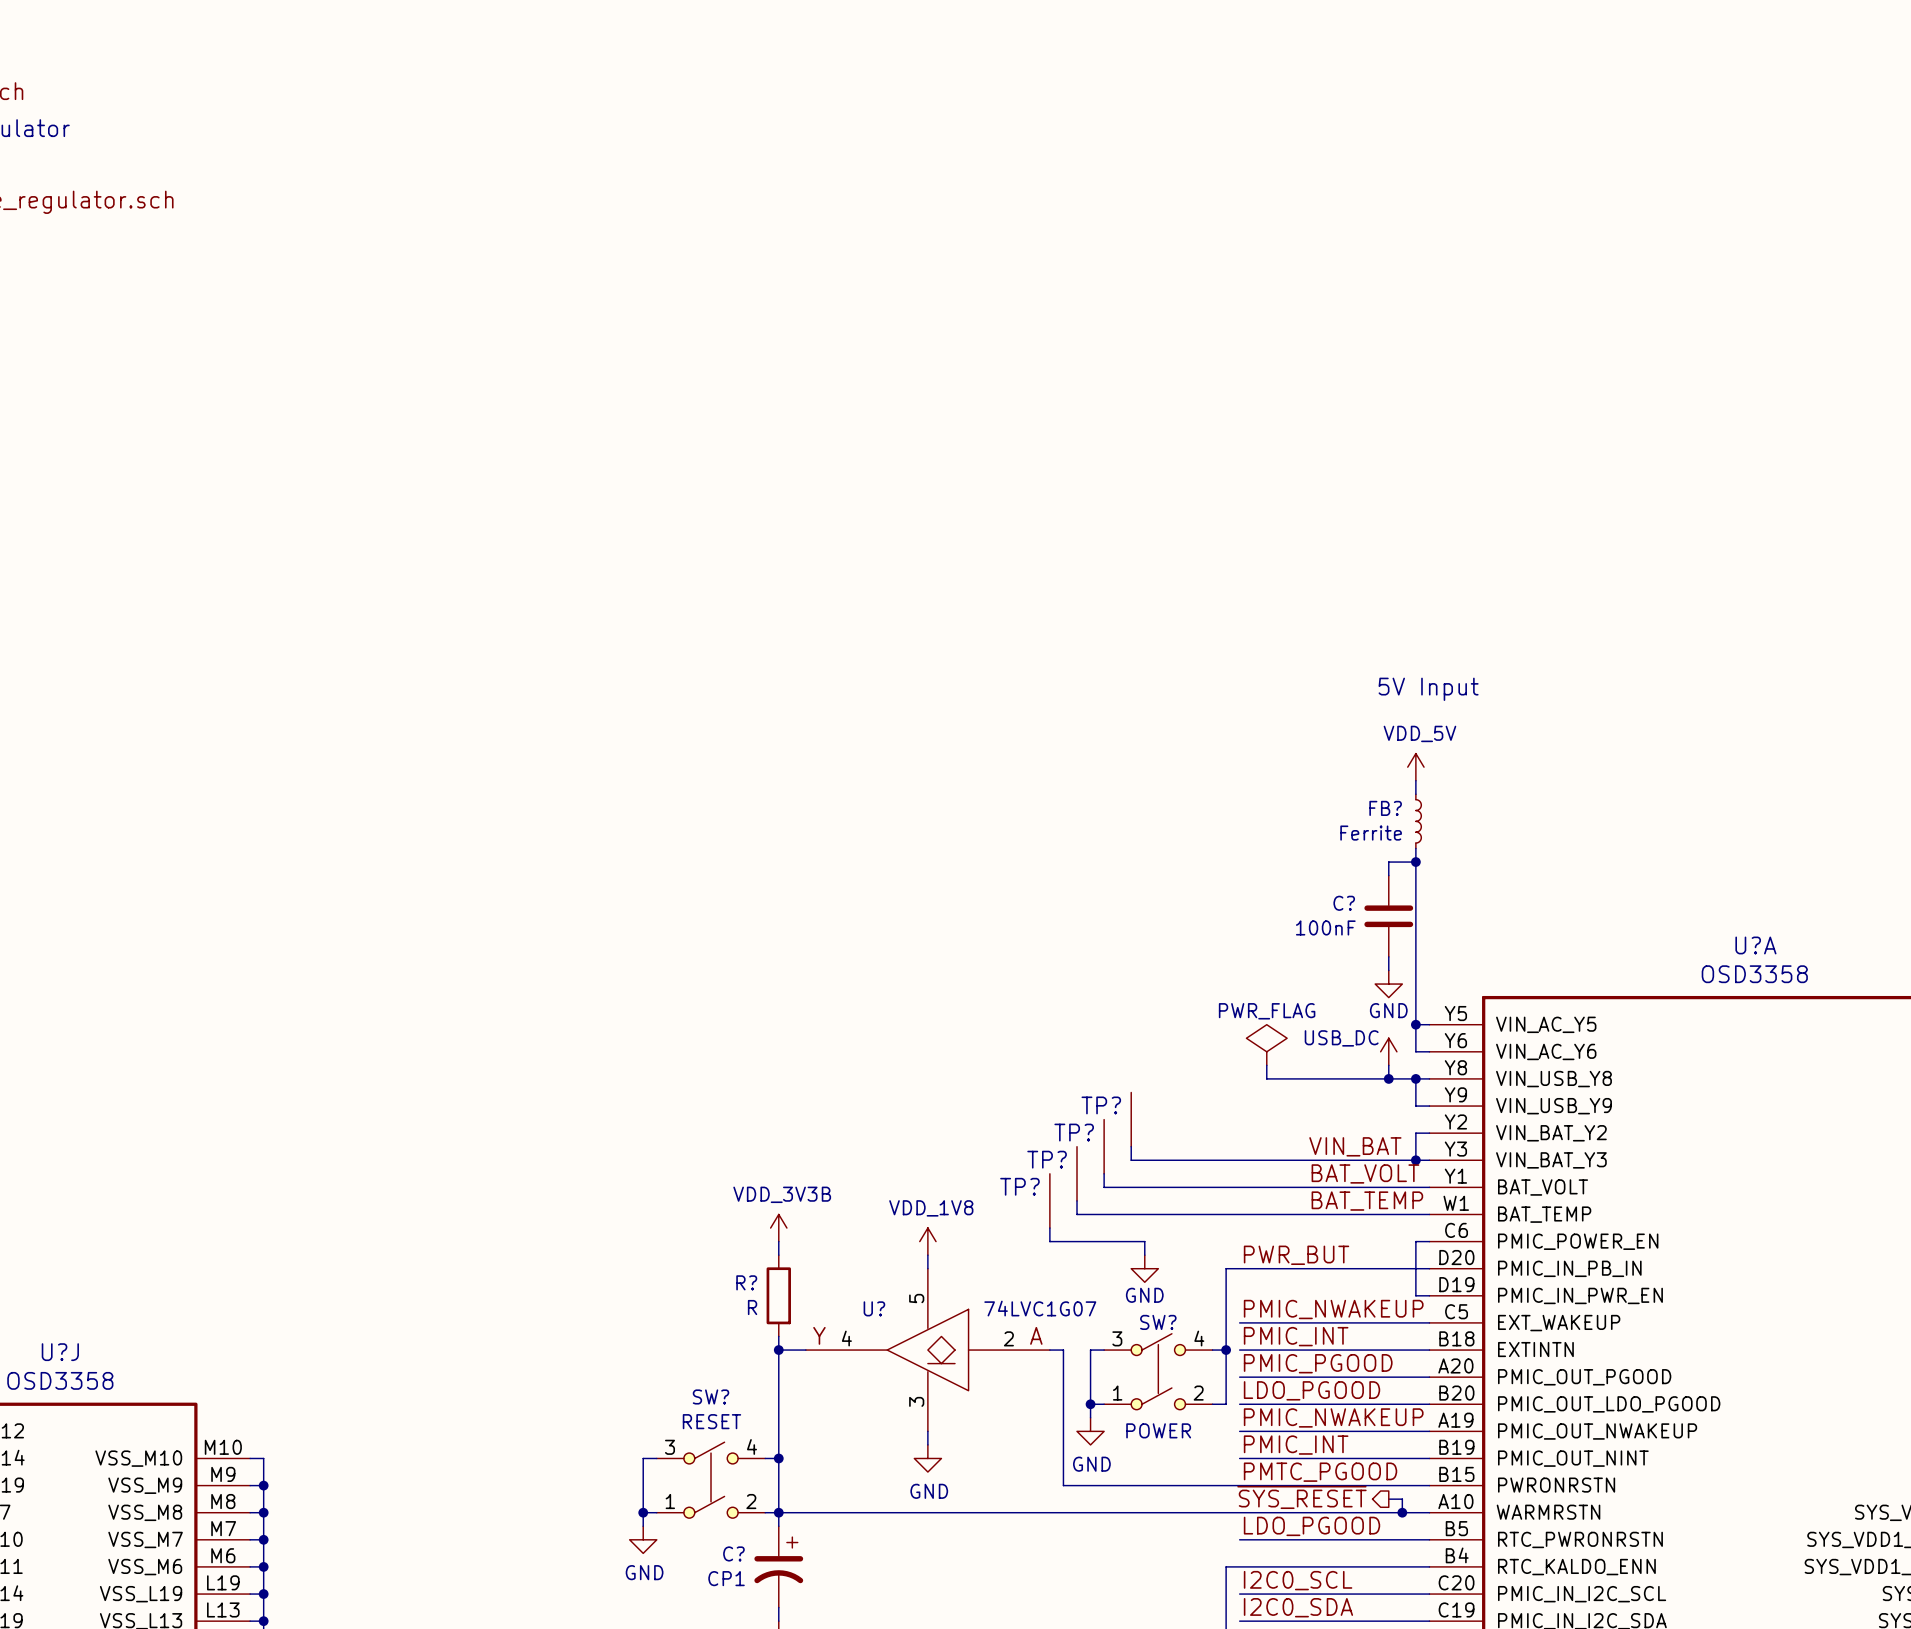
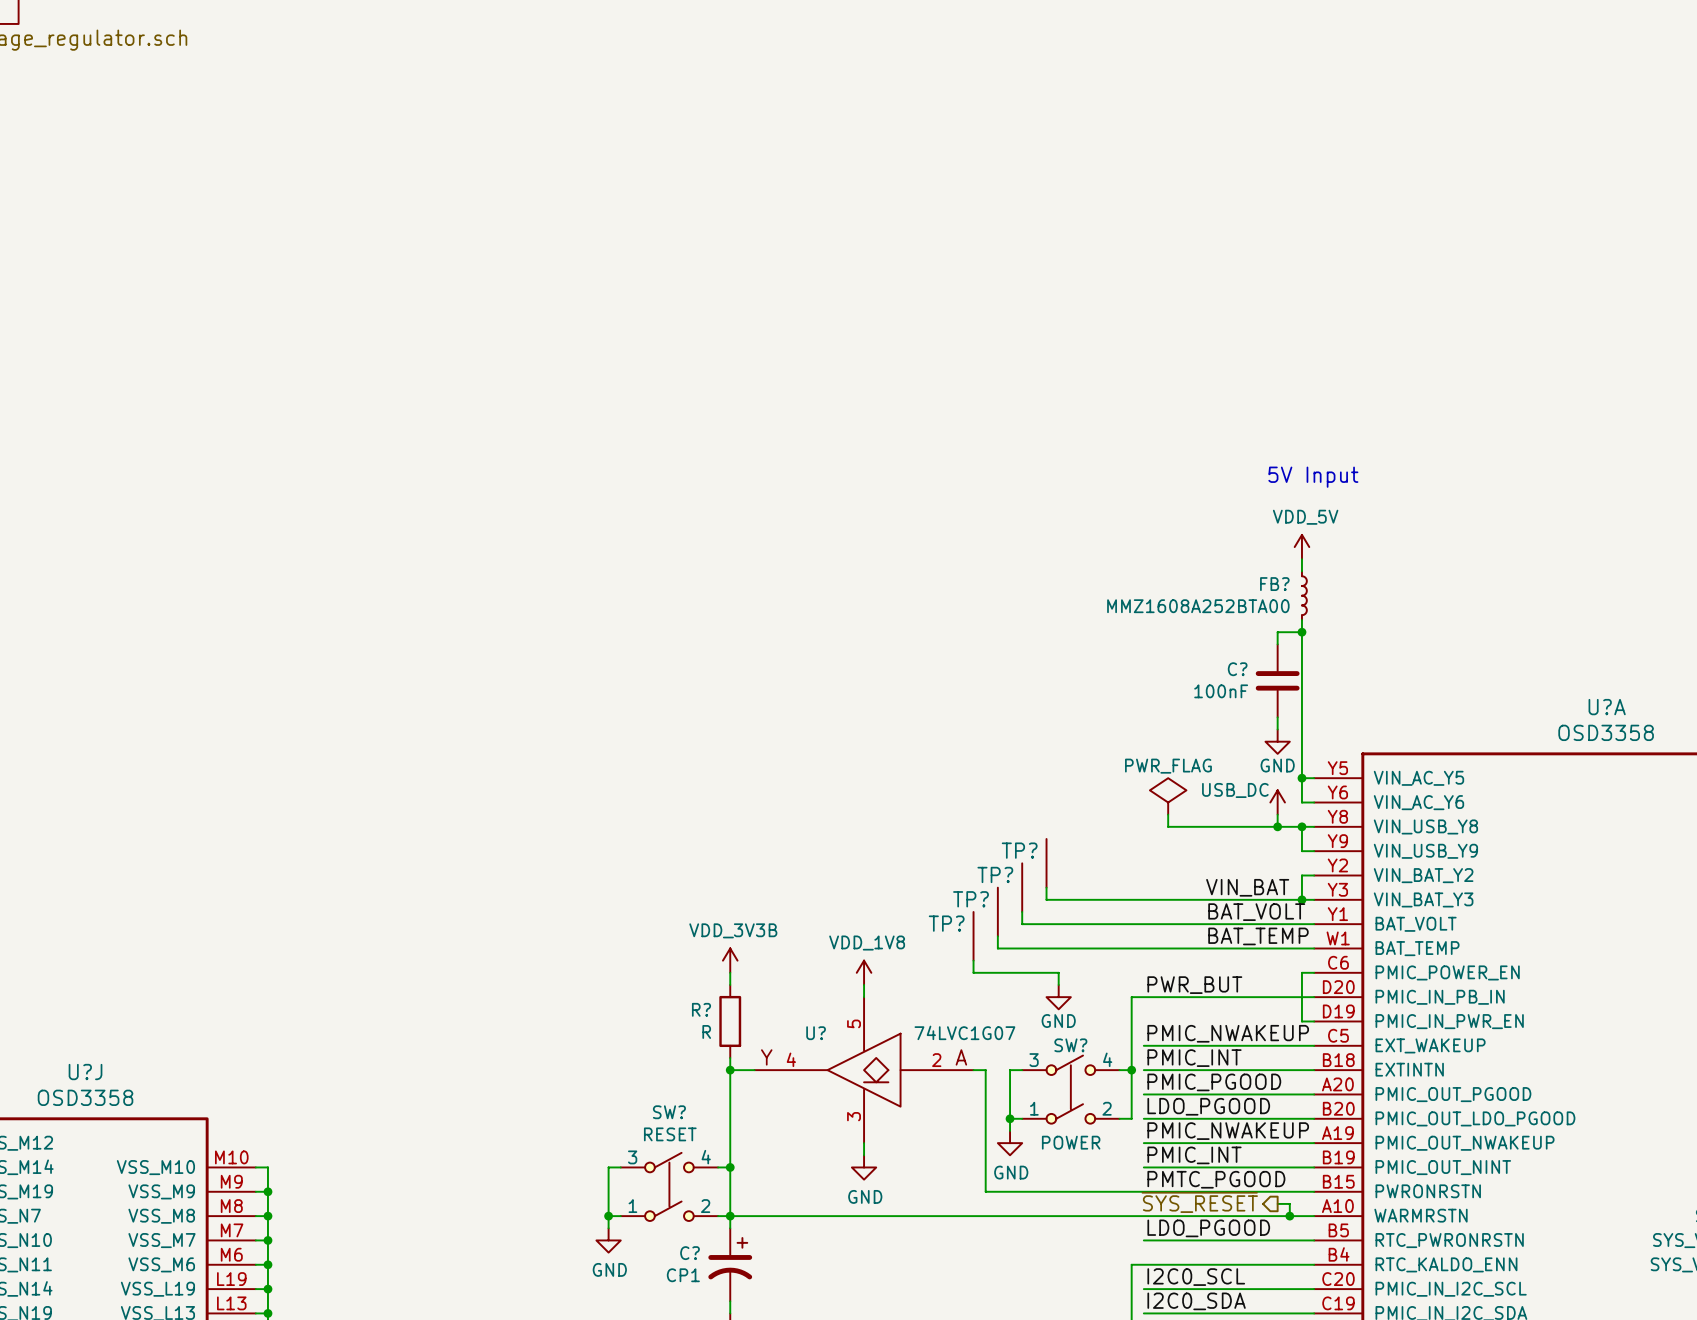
FB? value: Ferrite (1371, 833) -> MMZ1608A252BTA00 (1198, 606)

